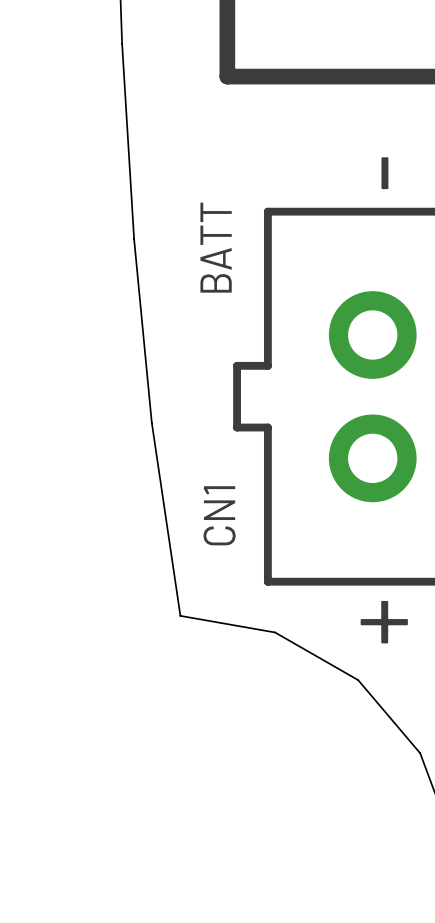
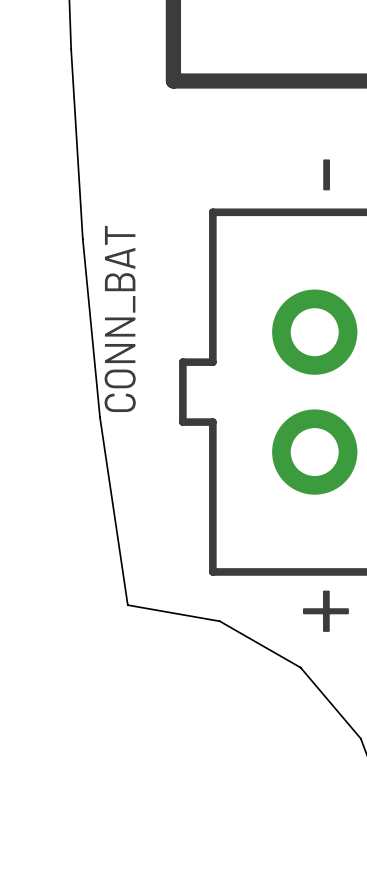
text: BATT (216, 247) -> none
CN1 name: CN1 (219, 515) -> CONN_BAT (120, 319)

